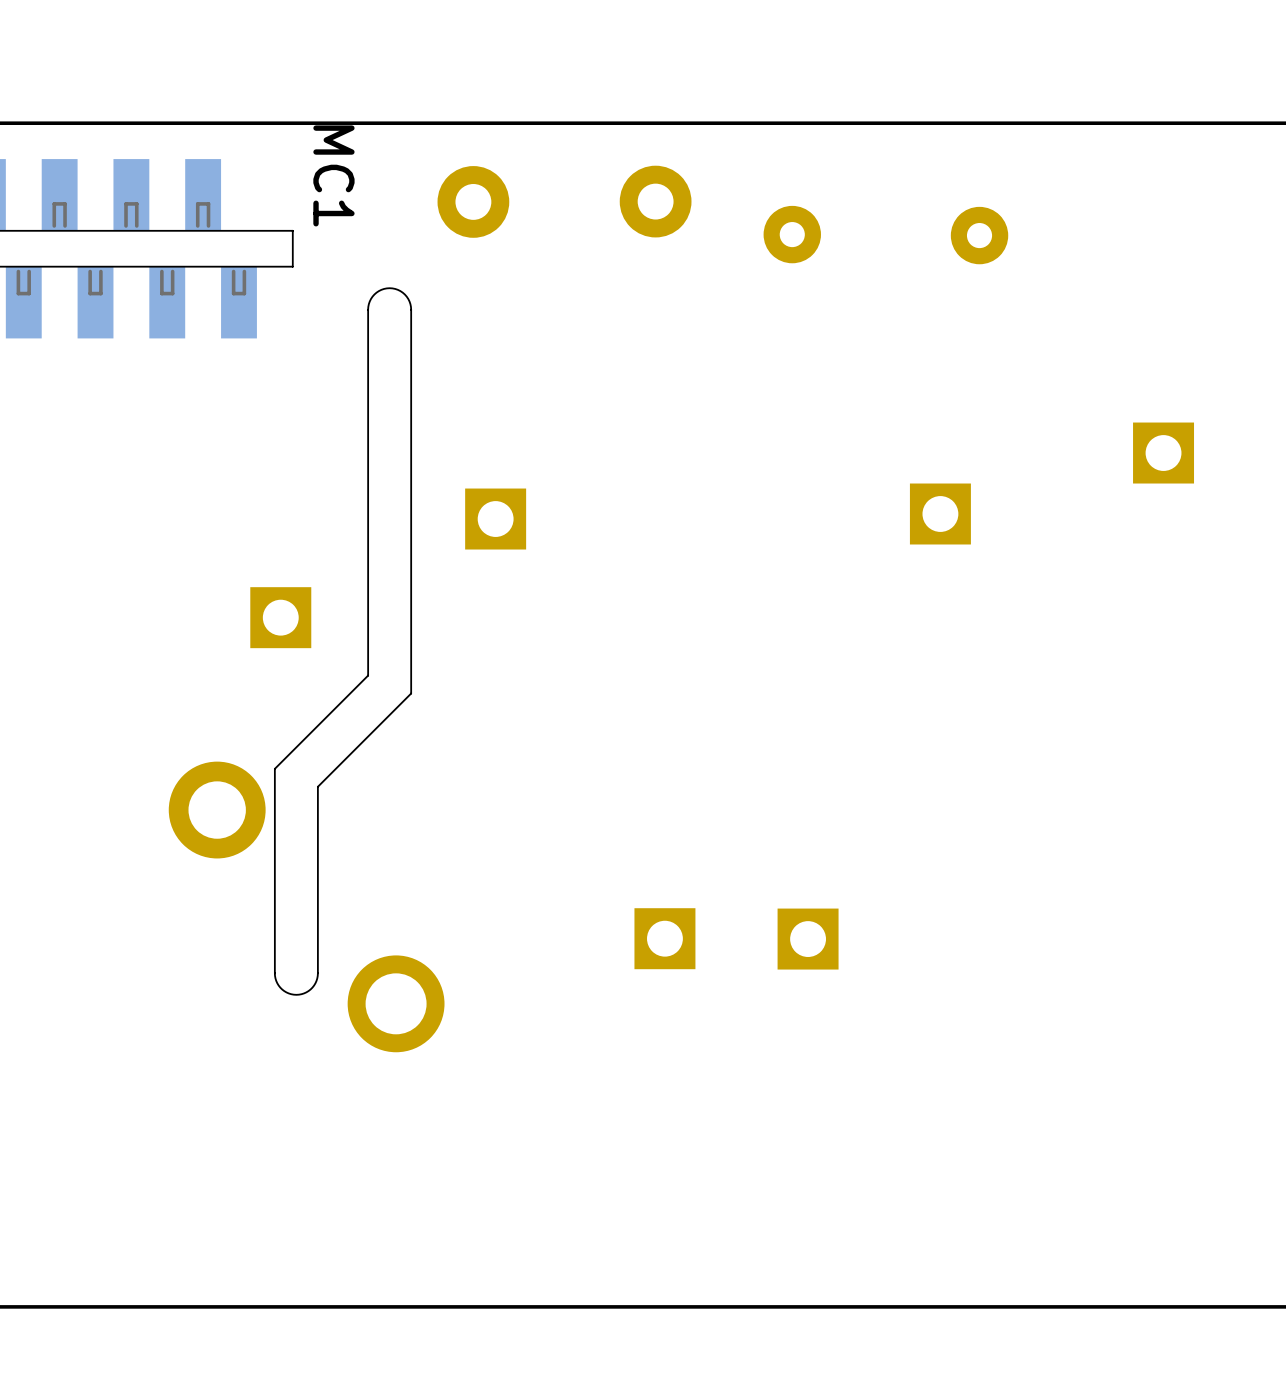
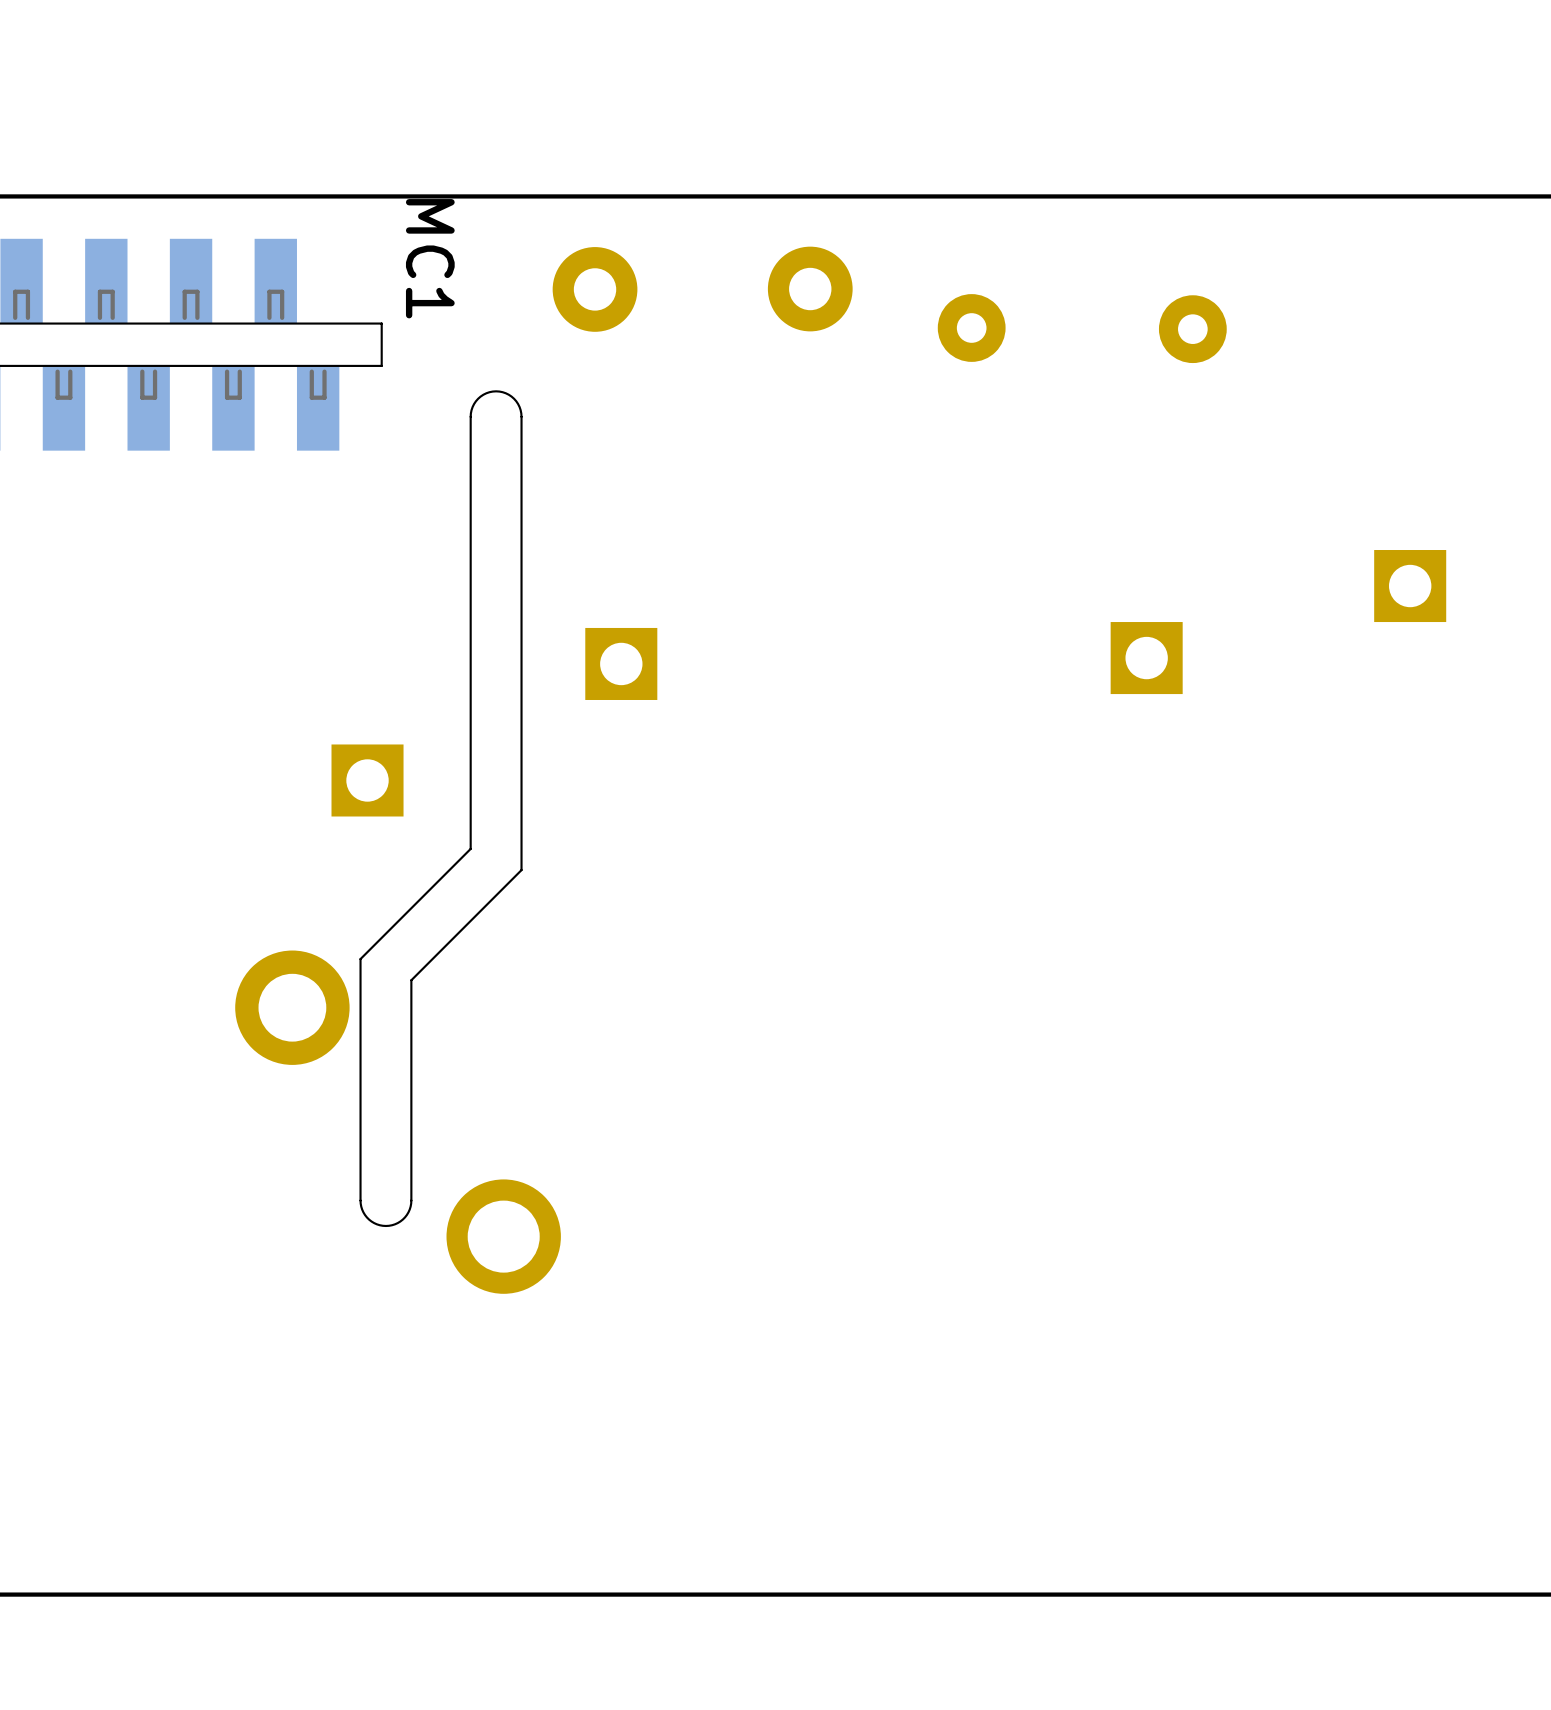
part: (664, 938) -> none
part: (808, 939) -> none

